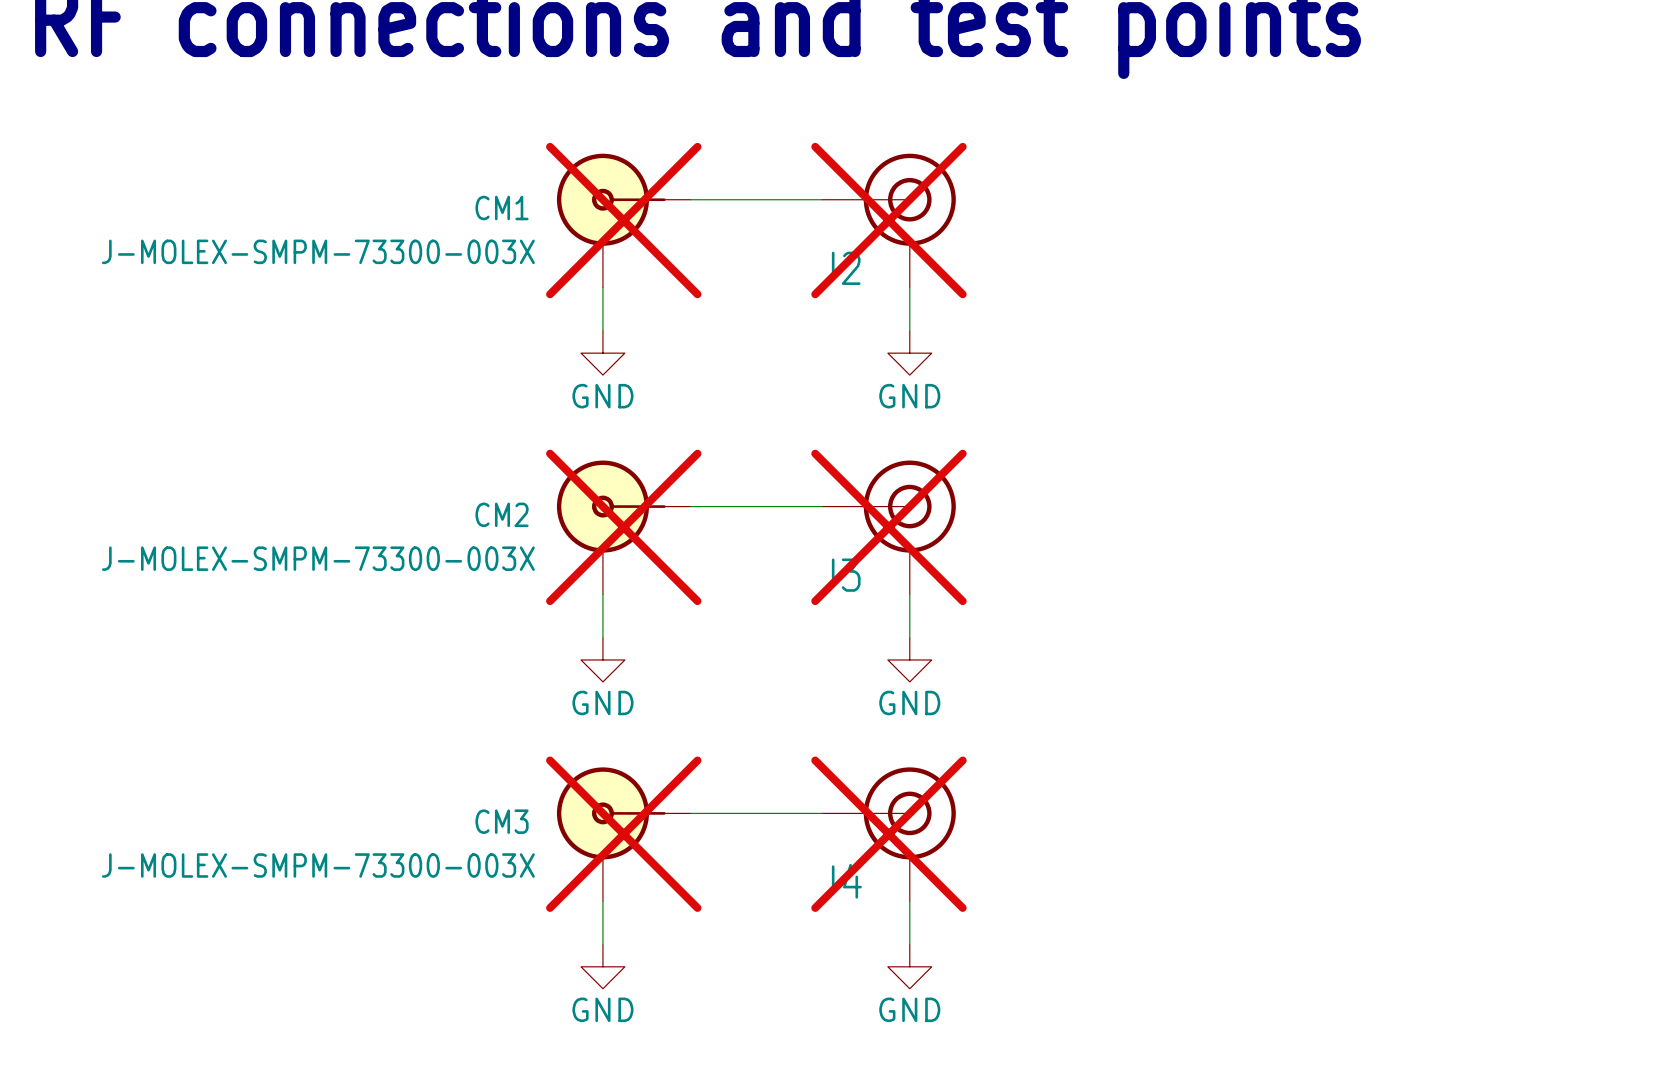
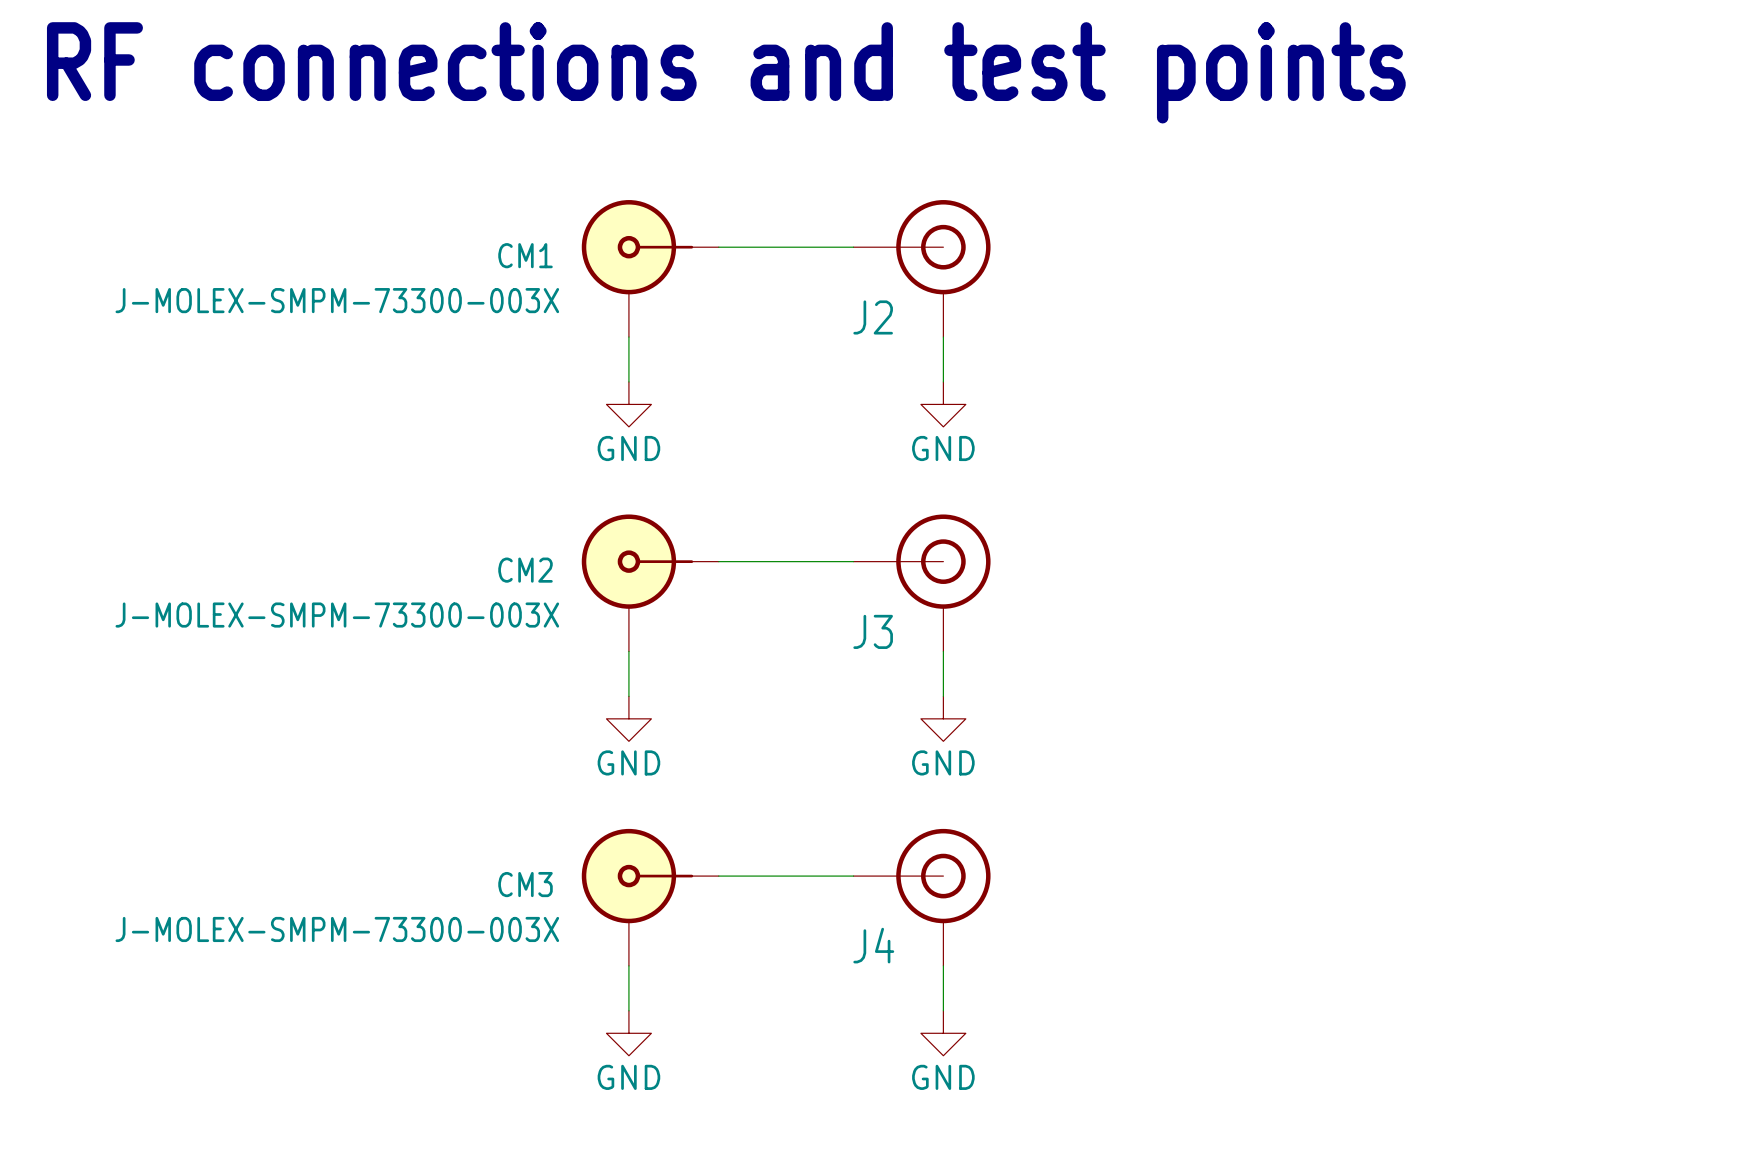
CM1 do-not-place cross: (623, 220) -> none
J2 do-not-place cross: (888, 220) -> none
CM2 do-not-place cross: (623, 527) -> none
J3 do-not-place cross: (888, 527) -> none
CM3 do-not-place cross: (623, 834) -> none
J4 do-not-place cross: (888, 834) -> none

